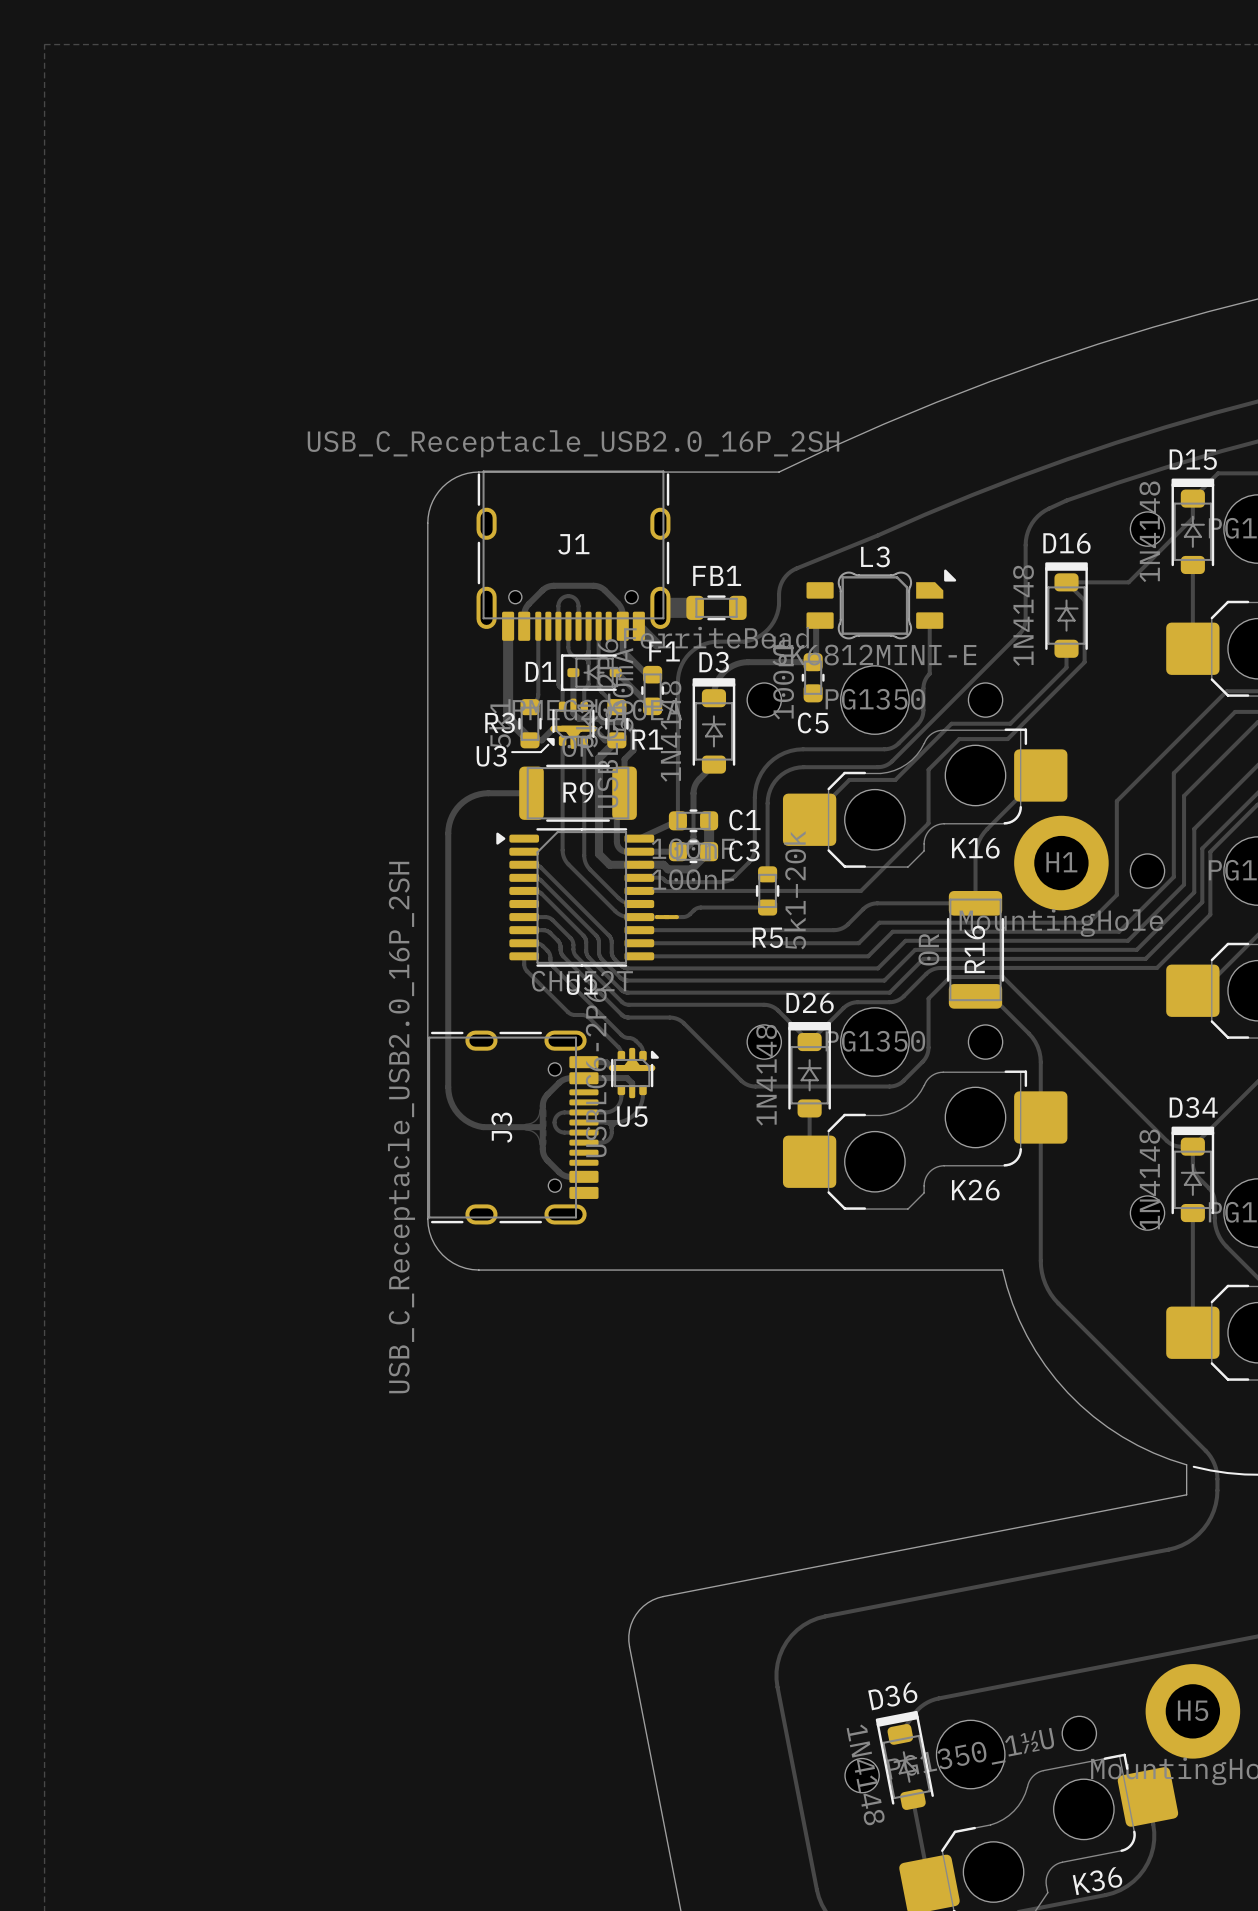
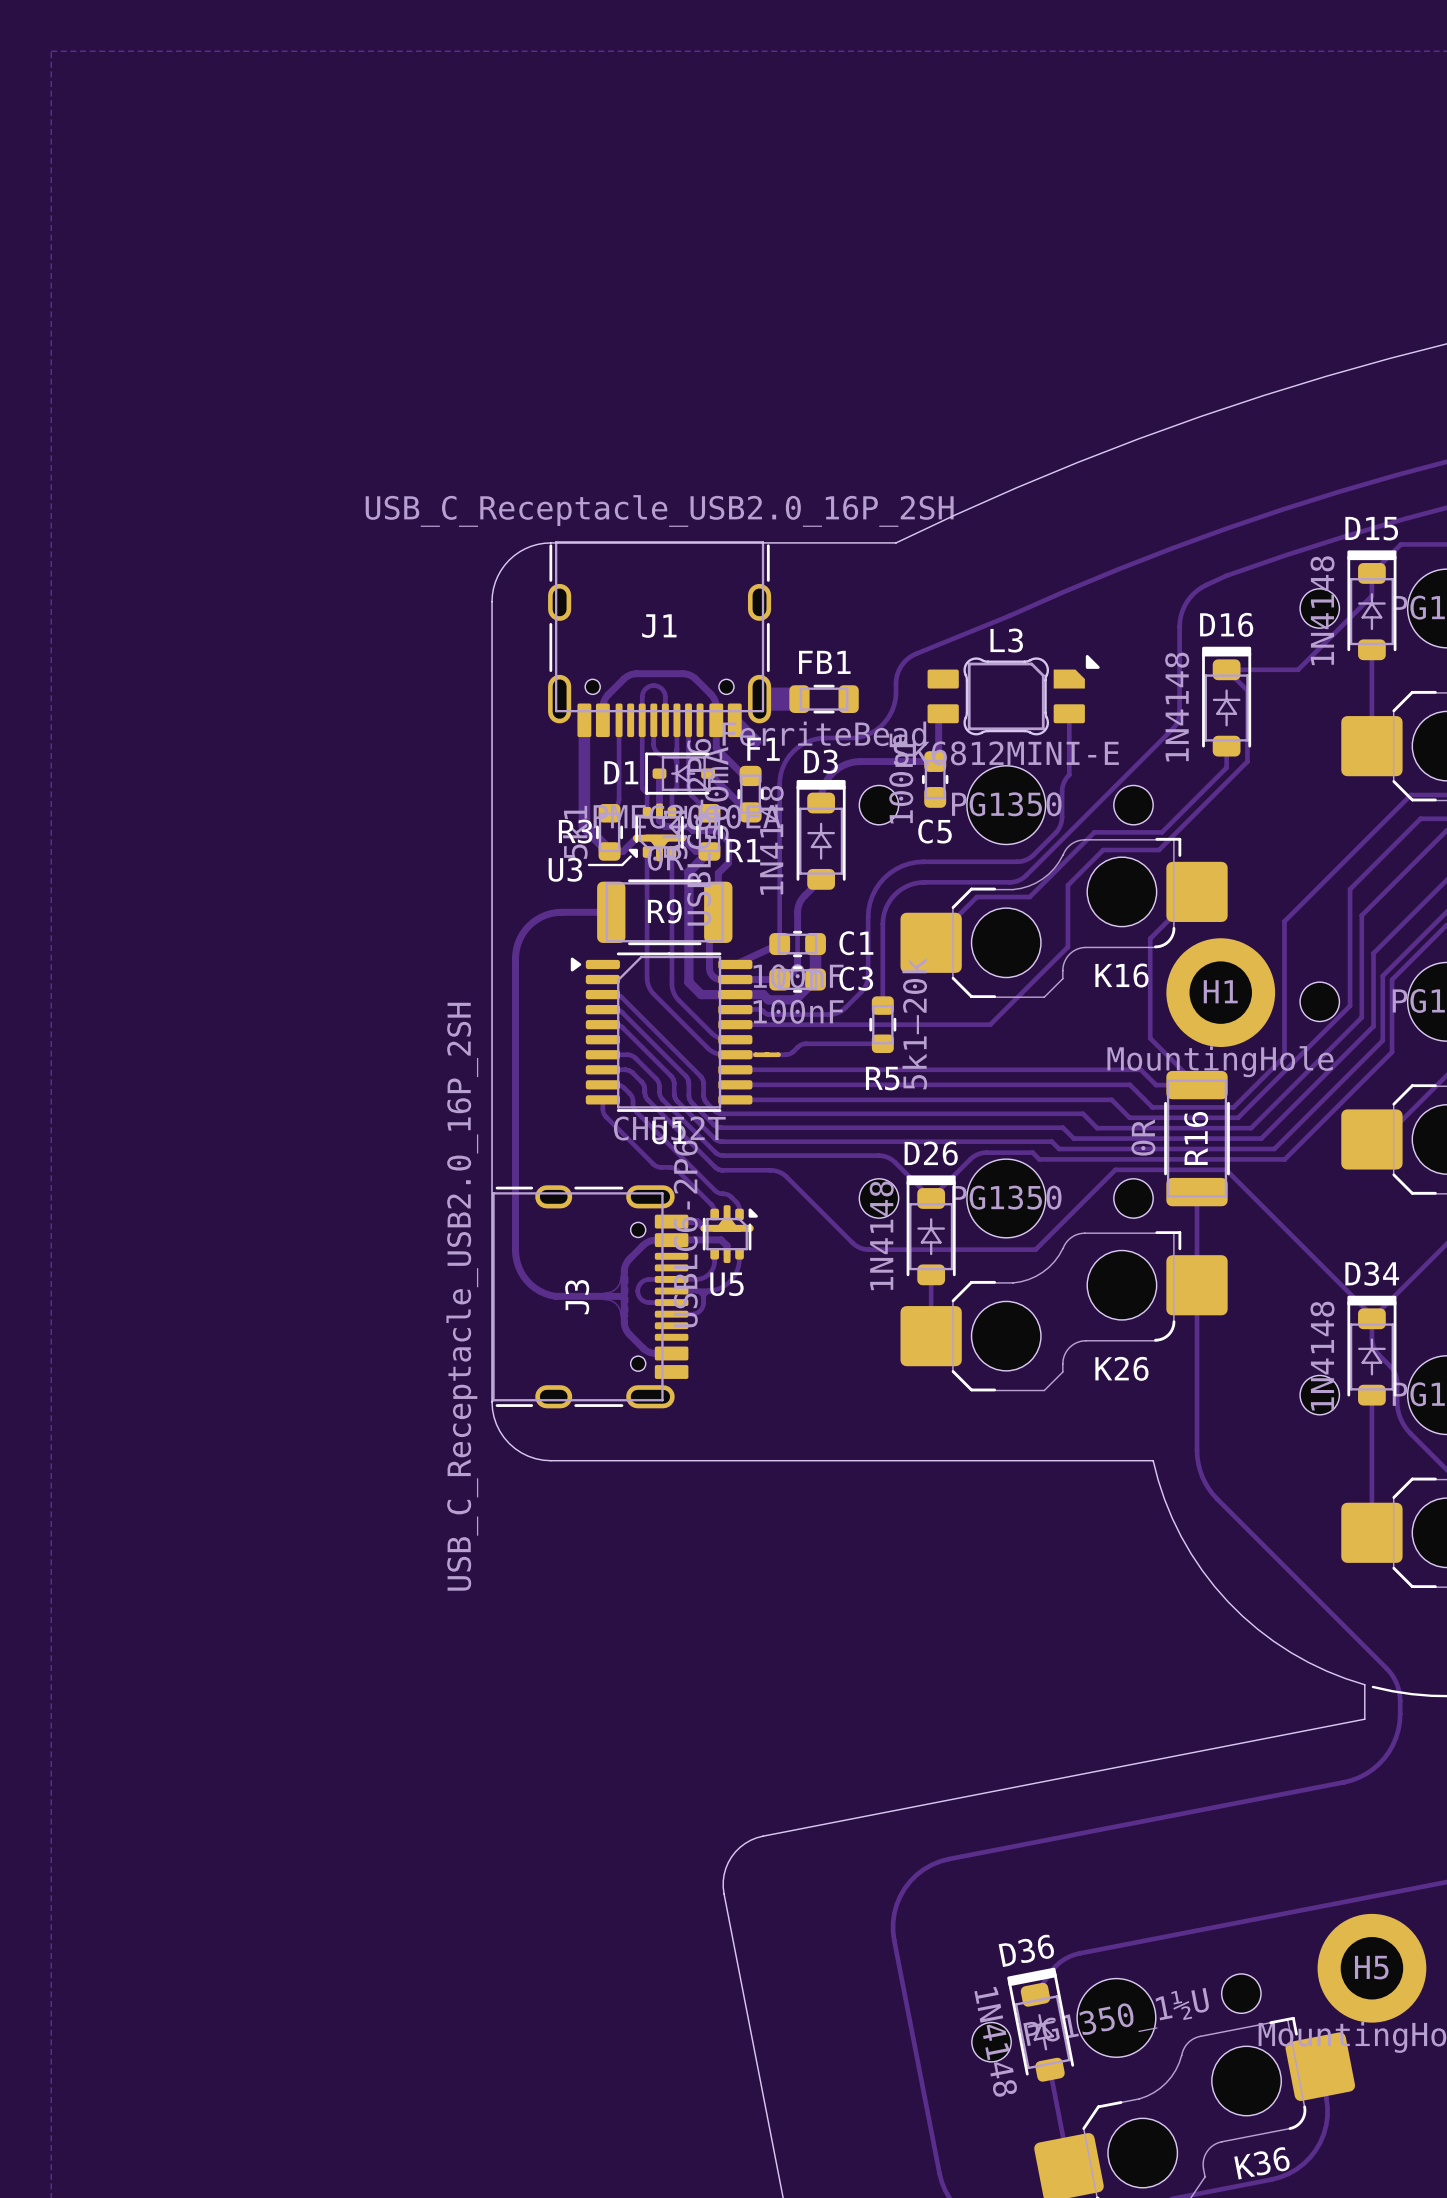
track: (1000, 816) (984, 832) (977, 845) (975, 854) (975, 903) (873, 903) (864, 907) (845, 926) (833, 930) -> (1150, 938) (1150, 1038) (1197, 1085) (1156, 1085) (1140, 1069) (959, 1069)
track: (1173, 874) (1173, 877) (1119, 931) (892, 931) (868, 956) -> (1350, 1005) (1238, 1117) (1129, 1117) (1111, 1099) (998, 1099)
track: (1116, 895) (1089, 922) (879, 922) (858, 943) -> (1284, 1029) (1284, 1056) (1233, 1107) (1152, 1107) (1129, 1084) (987, 1084)
track: (1202, 902) (1145, 958) (923, 958) (889, 992) -> (1382, 1037) (1382, 1040) (1274, 1149) (1059, 1149) (1051, 1141) (1023, 1141)
track: (1210, 914) (1157, 967) (940, 967) -> (1392, 1052) (1284, 1159) (1039, 1159) (1032, 1152) (1023, 1152)
track: (1127, 940) (905, 940) (877, 968) -> (1297, 1082) (1251, 1128) (1097, 1128) (1082, 1113) (1009, 1113)
R16 position: (975, 949) -> (1197, 1138)
track: (1136, 949) (915, 949) (884, 980) -> (1307, 1092) (1261, 1138) (1073, 1138) (1062, 1127) (1017, 1127)
track: (940, 968) (927, 972) (900, 998) (889, 1002) -> none
track: (991, 996) (1032, 1037) (1037, 1046) (1040, 1062) -> (1197, 1198) (1197, 1221)
track: (889, 1086) (902, 1081) (926, 1057) (928, 1047) (928, 998) (950, 977) (1002, 977) (1168, 1142) (1177, 1146) (1192, 1146) -> (1023, 1249) (1035, 1249) (1115, 1169) (1226, 1169) (1371, 1315)

